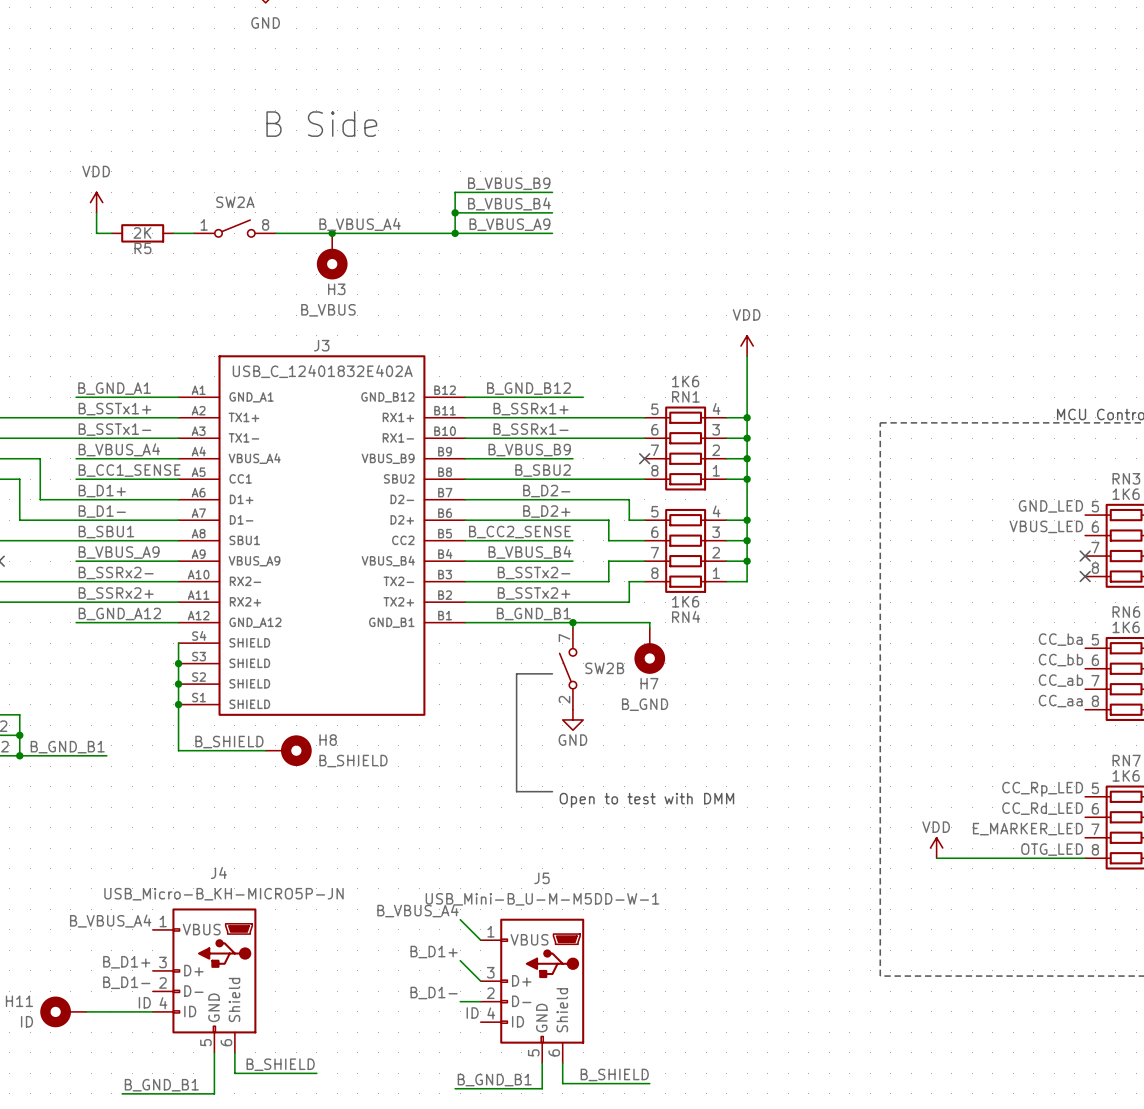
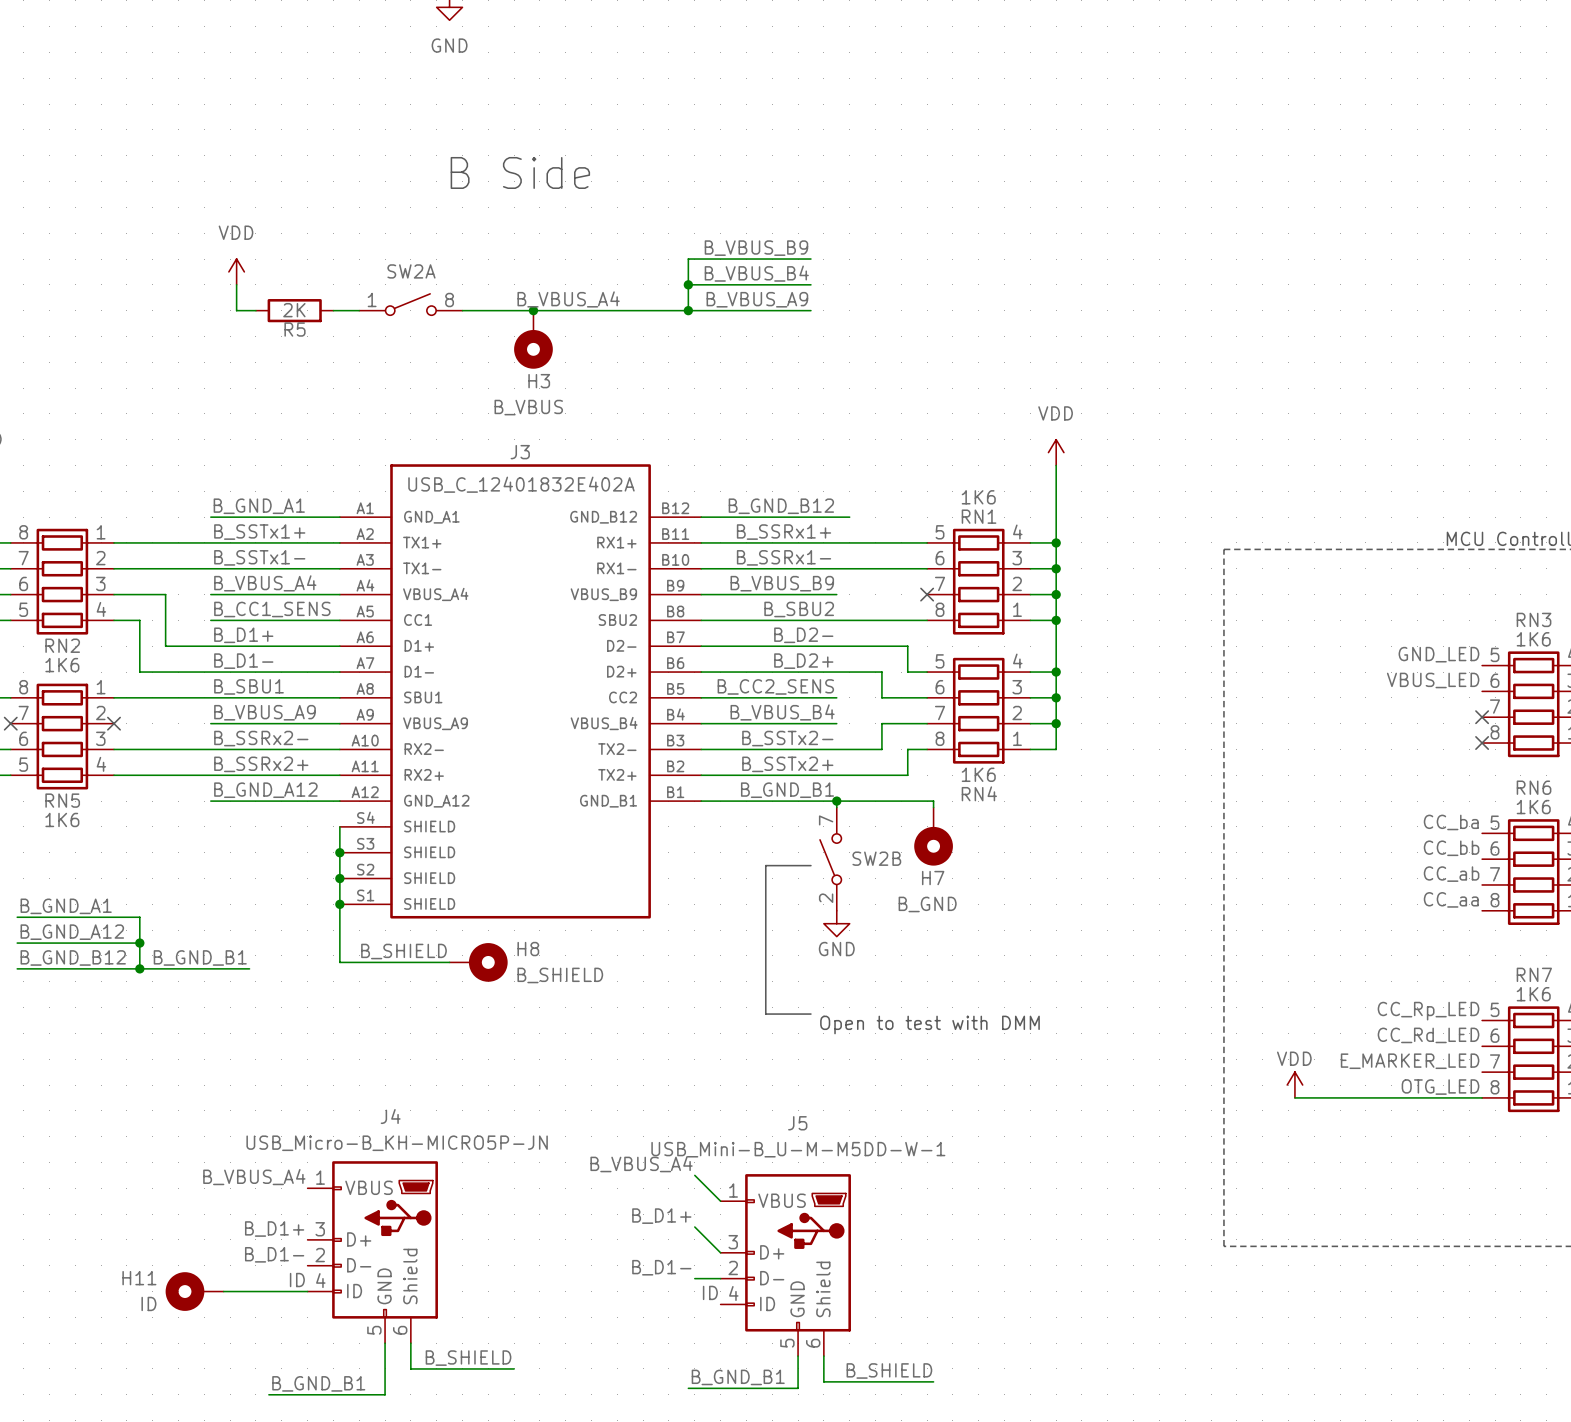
label: B_CC1_SENSE (129, 470) -> B_CC1_SENS (272, 609)
label: B_CC2_SENSE (519, 532) -> B_CC2_SENS (775, 686)

